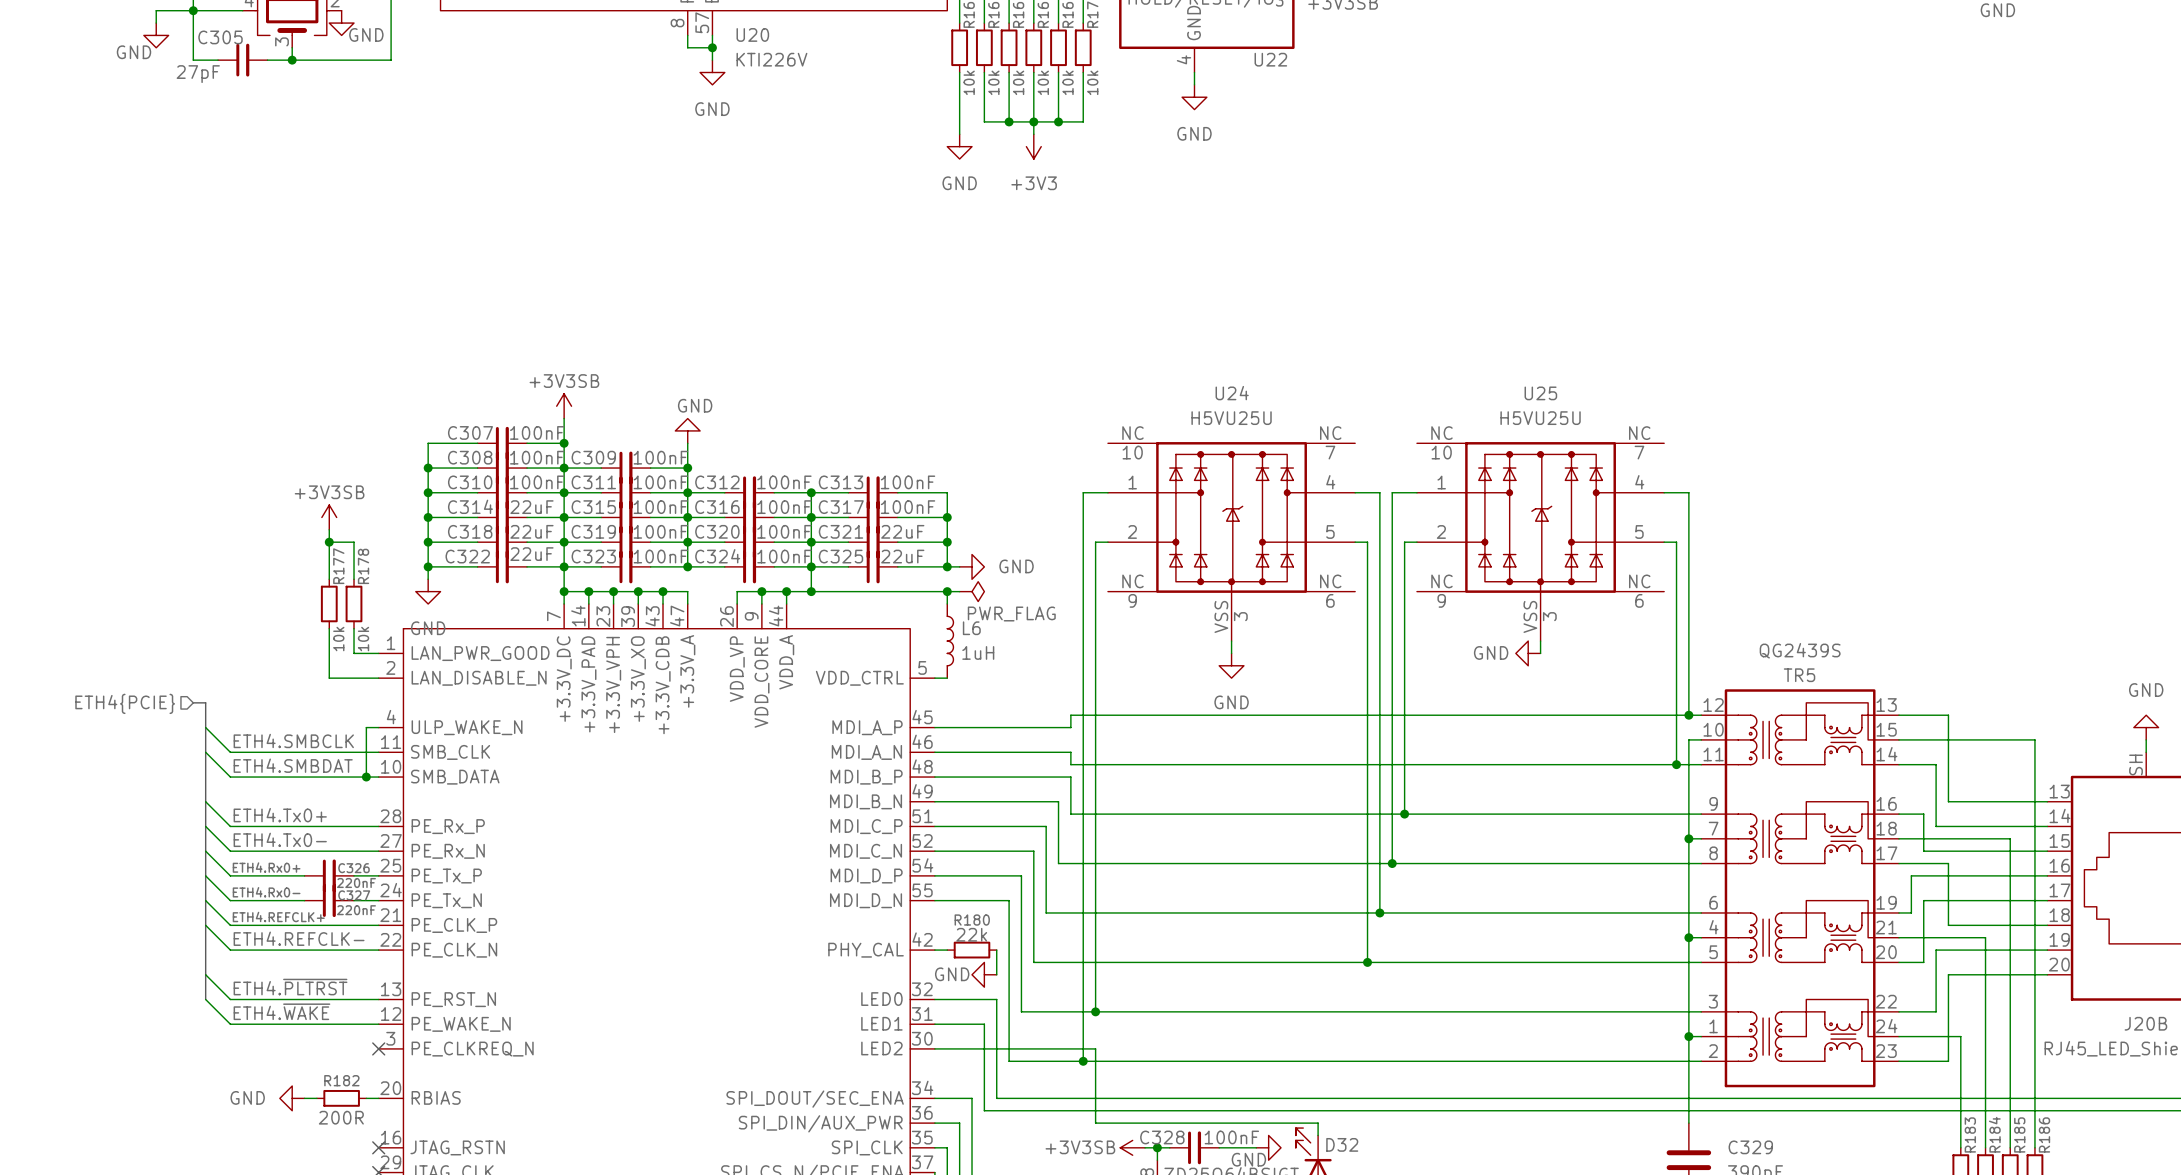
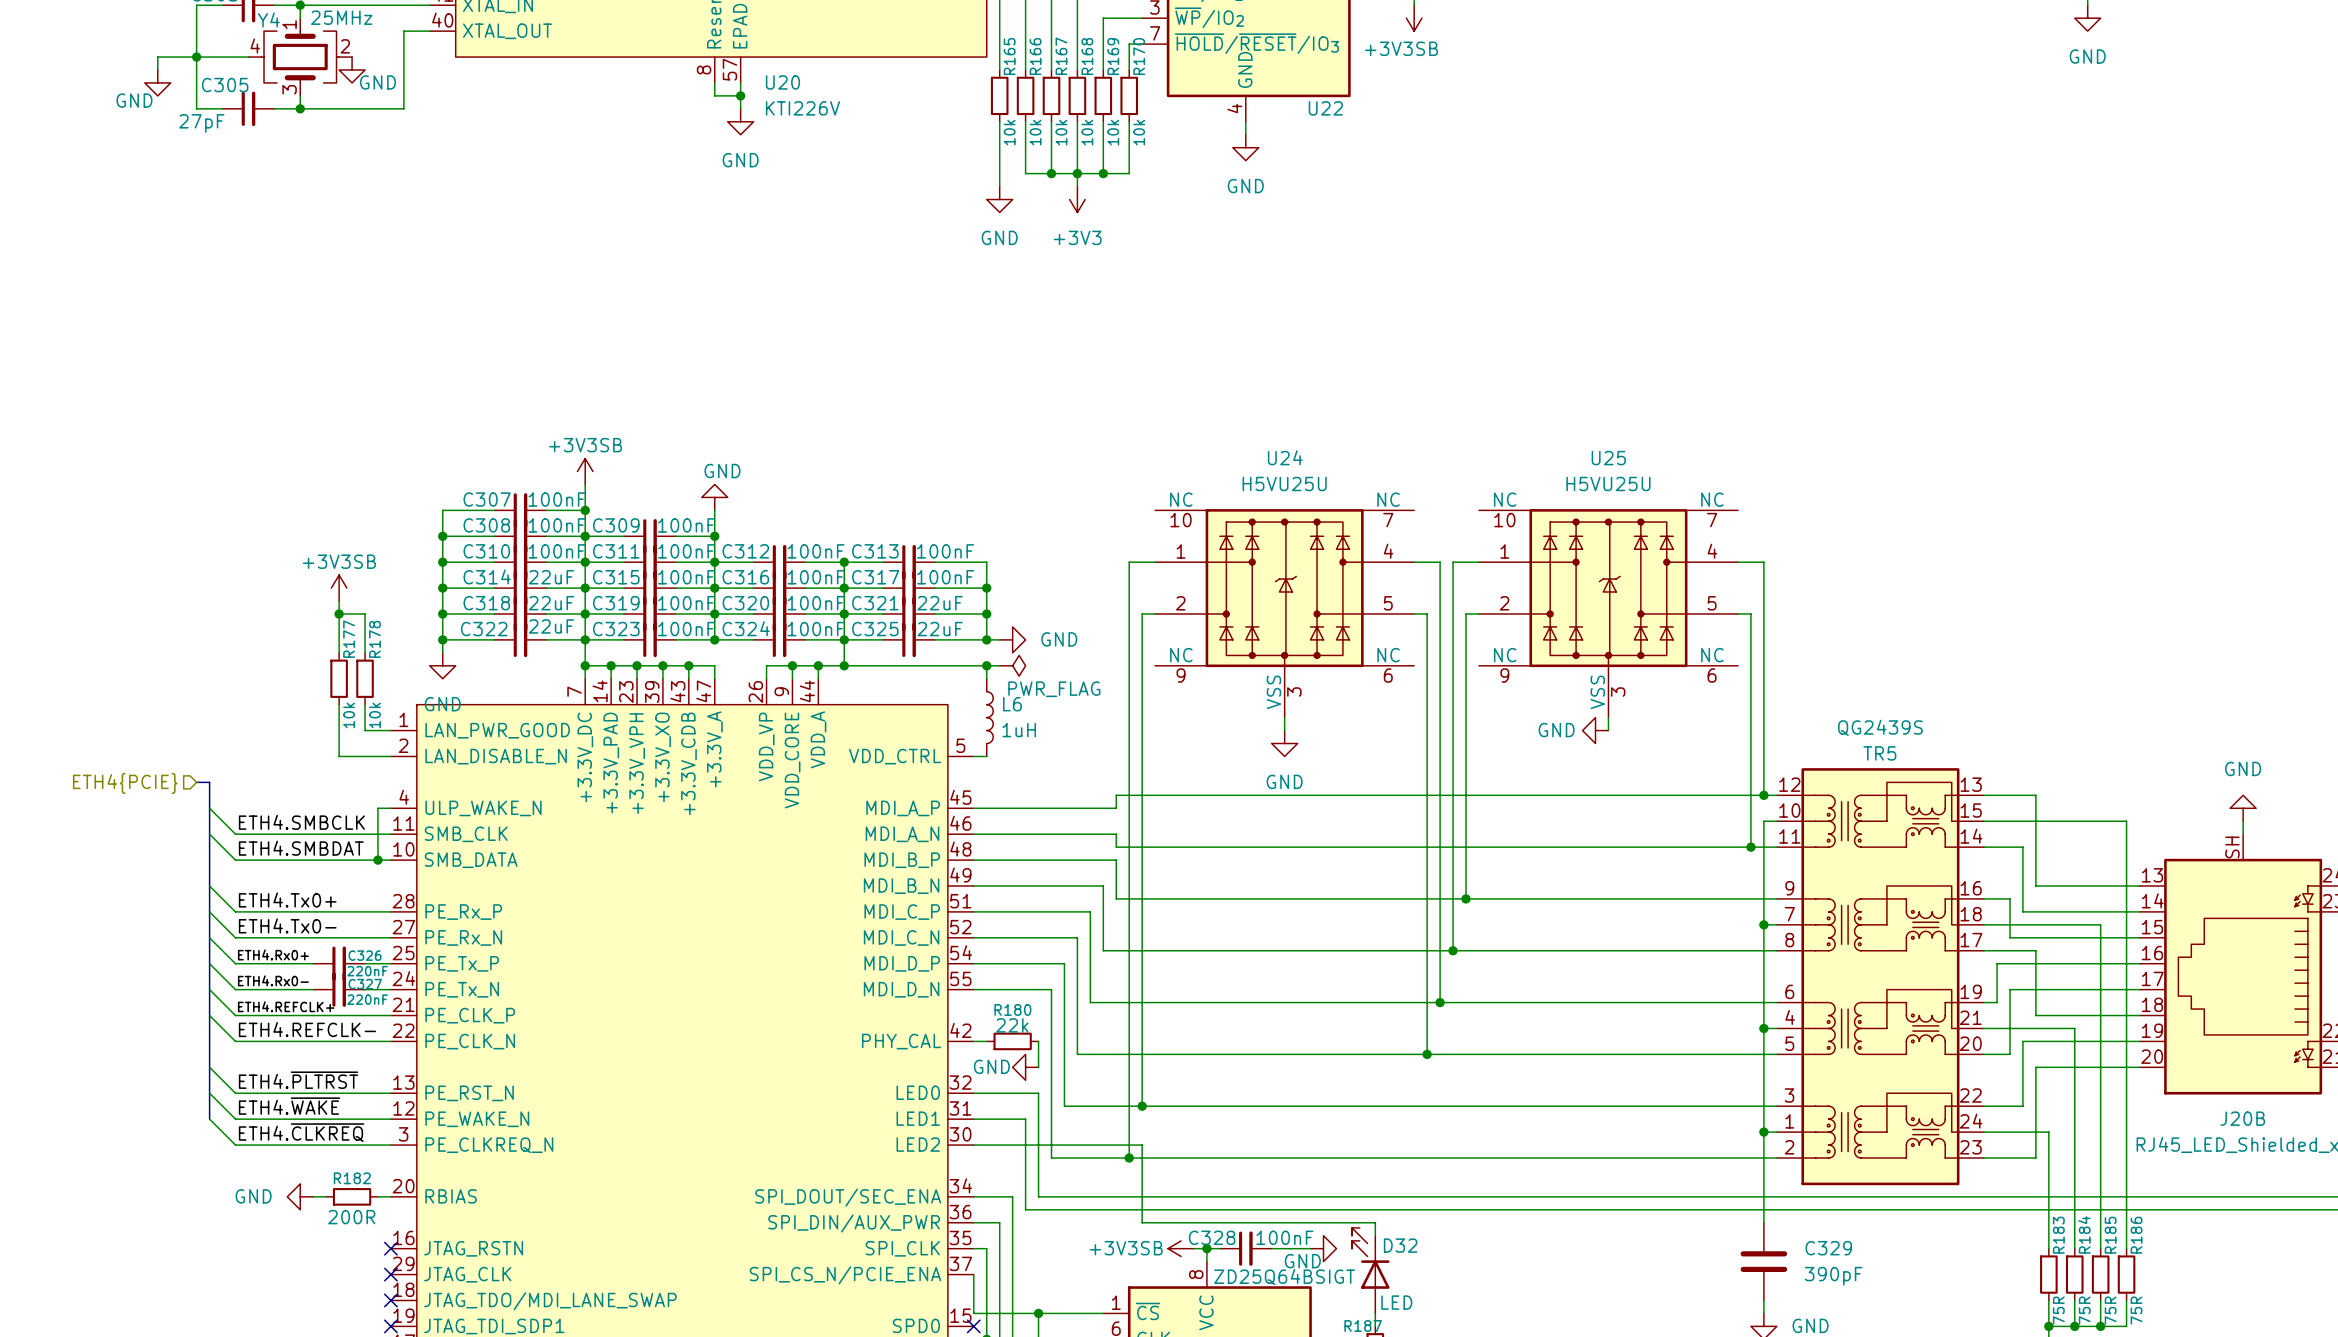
bus: none -> (209, 1093) (209, 1119)
wire: none -> (209, 1119) (235, 1145) (390, 1145)
label: none -> ETH4.~{CLKREQ} (301, 1132)
no-connect mark: (378, 1048) -> none

